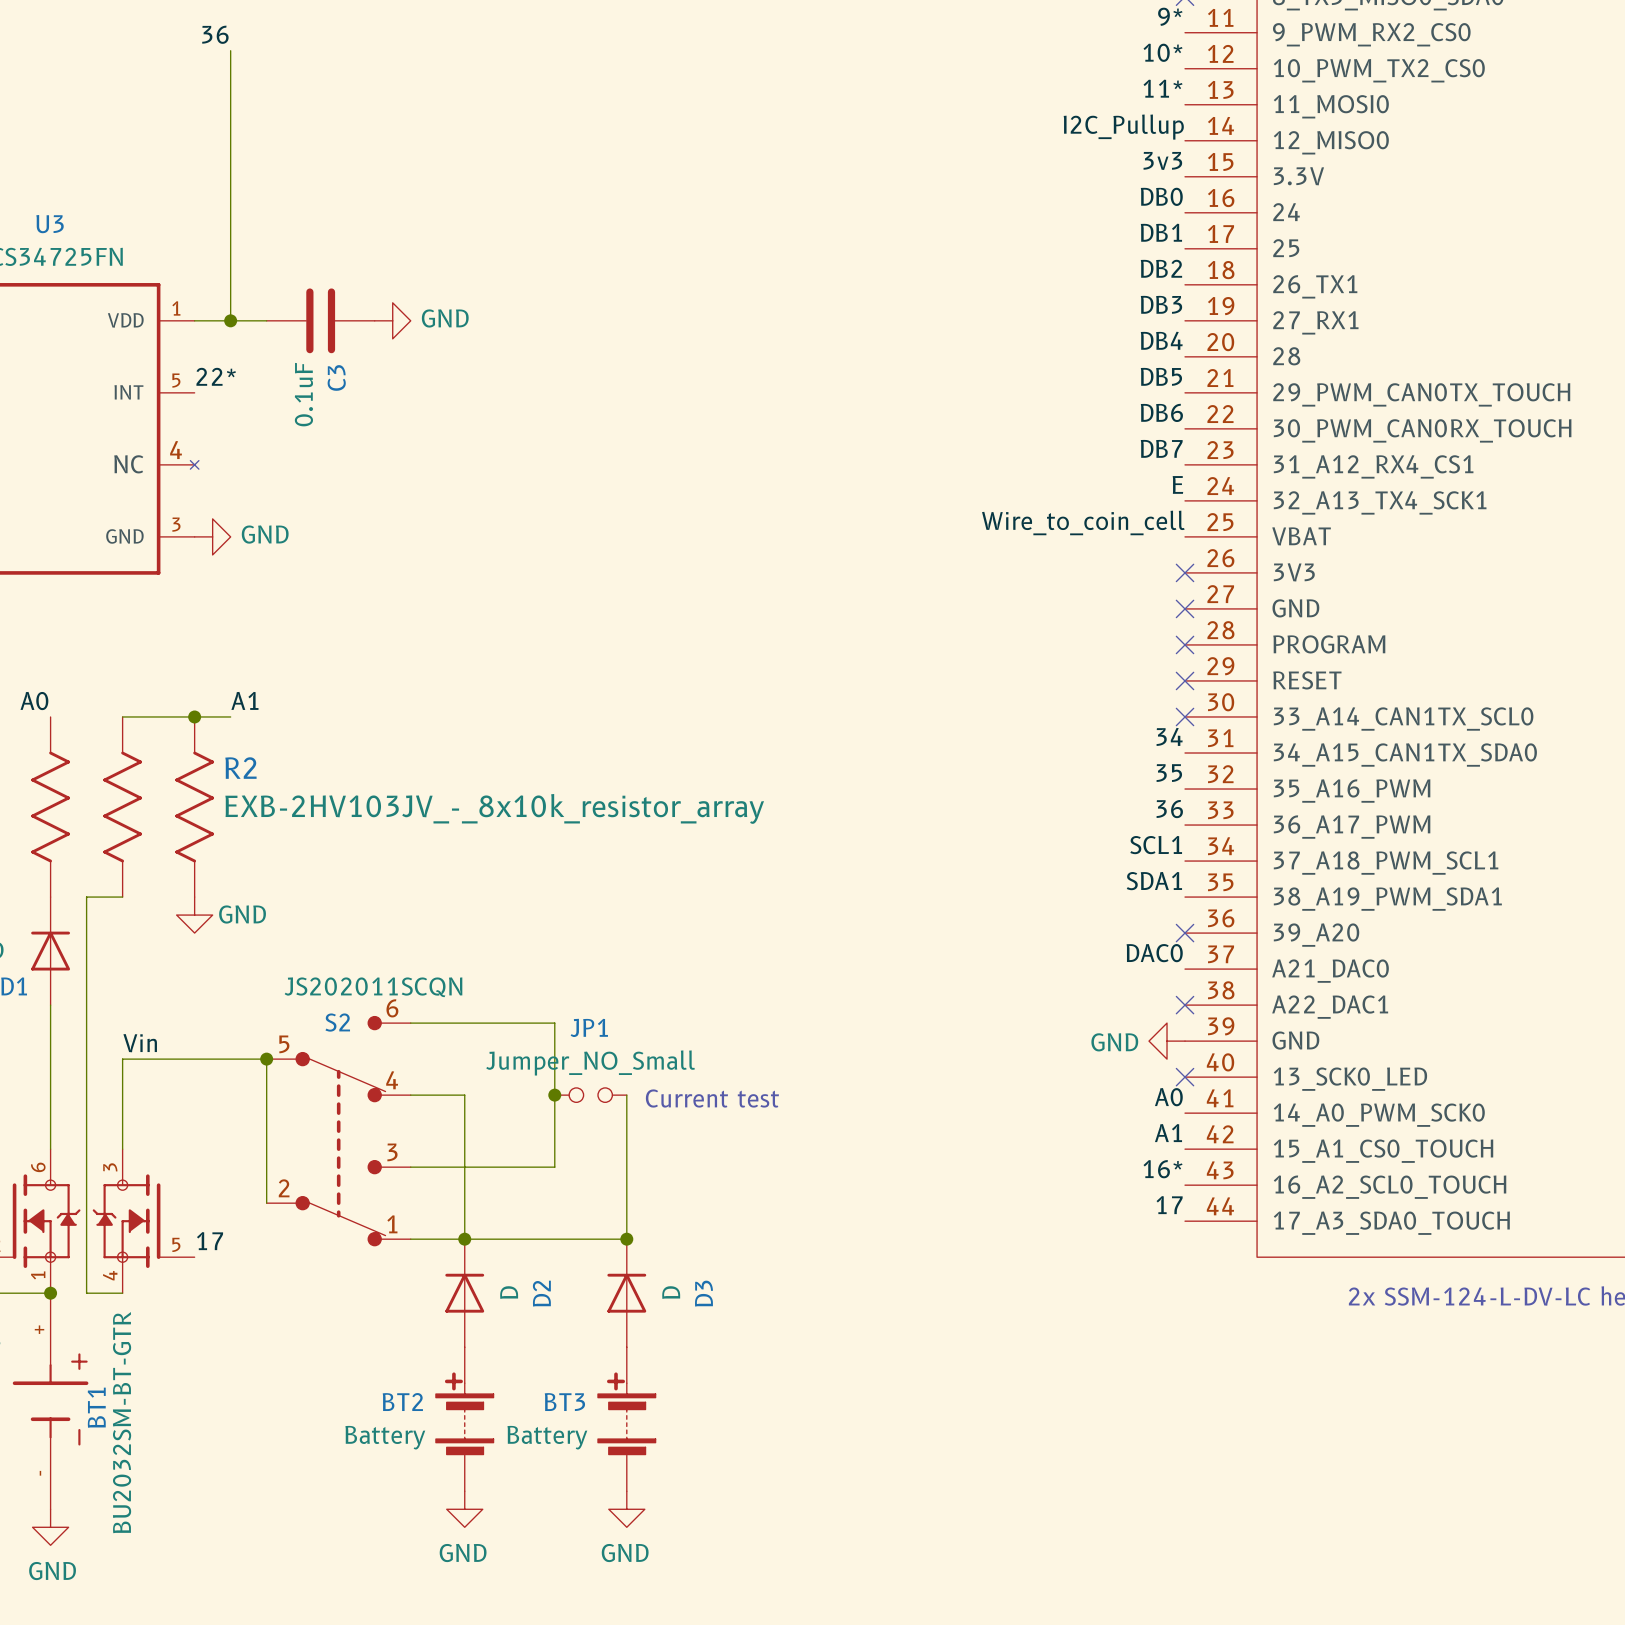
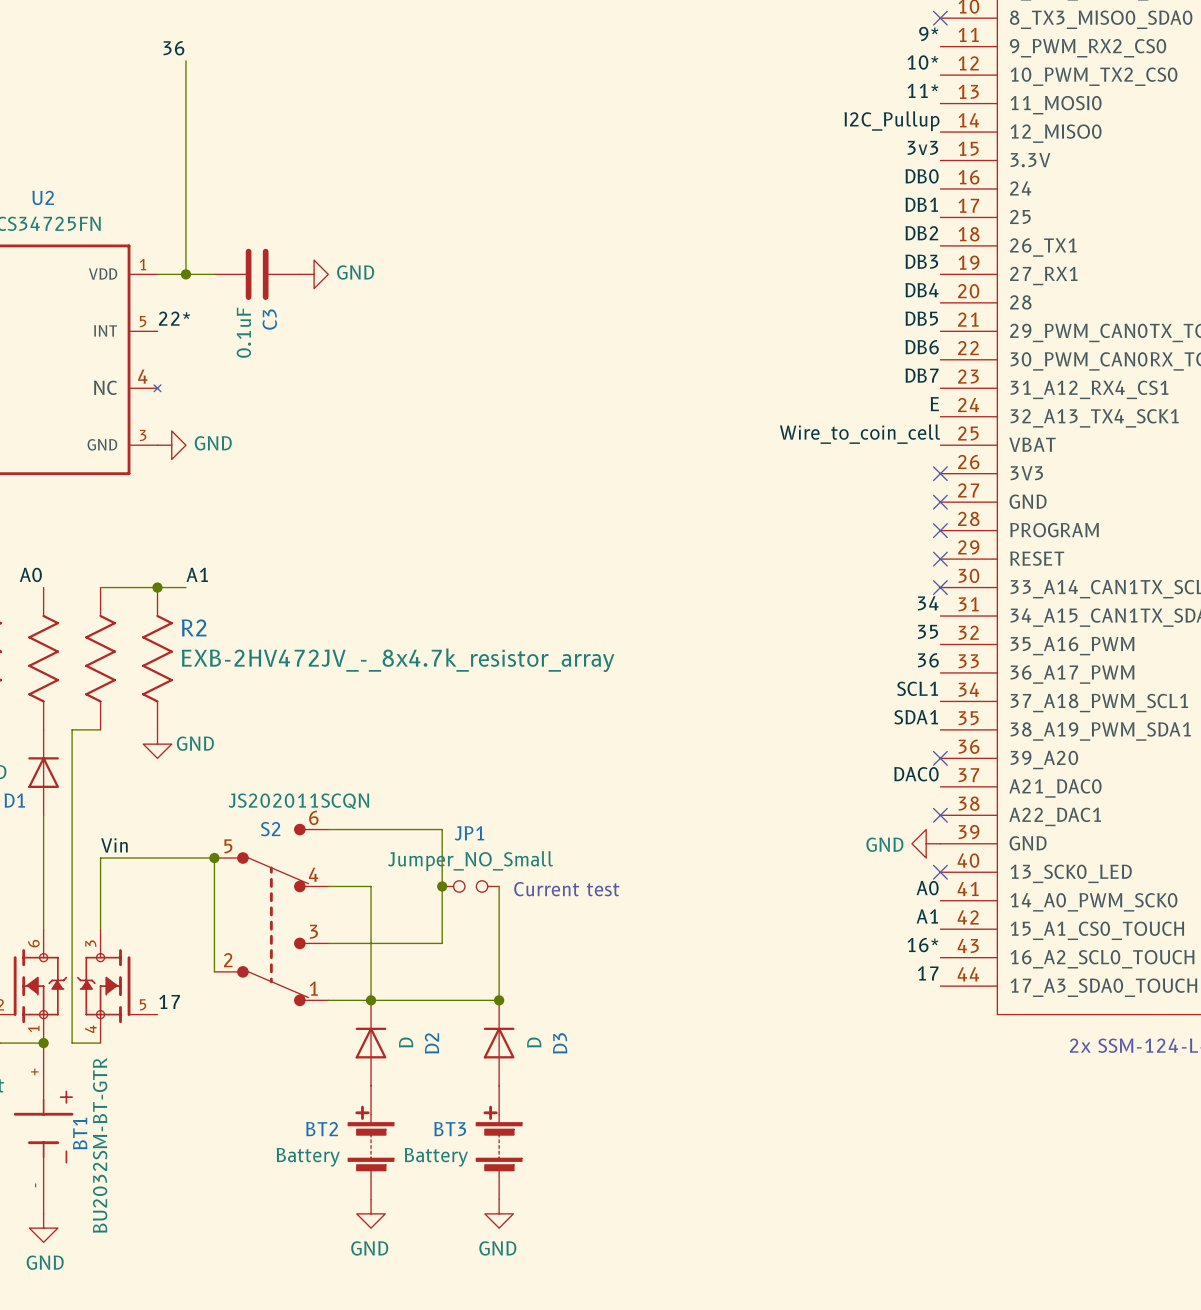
U3 name: U3 (50, 224) -> U2 (43, 197)
R2 value: EXB-2HV103JV_-_8x10k_resistor_array (494, 808) -> EXB-2HV472JV_-_8x4.7k_resistor_array (398, 660)

